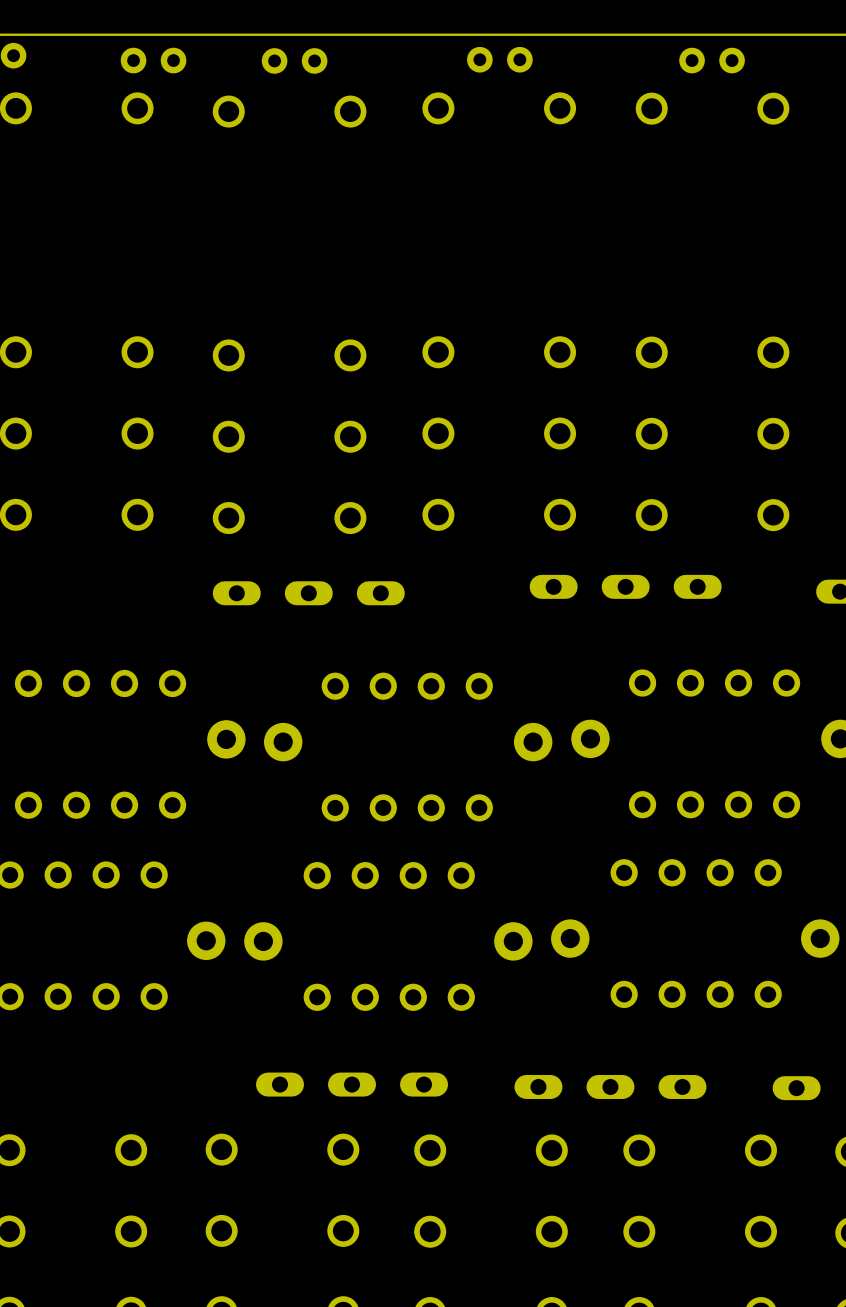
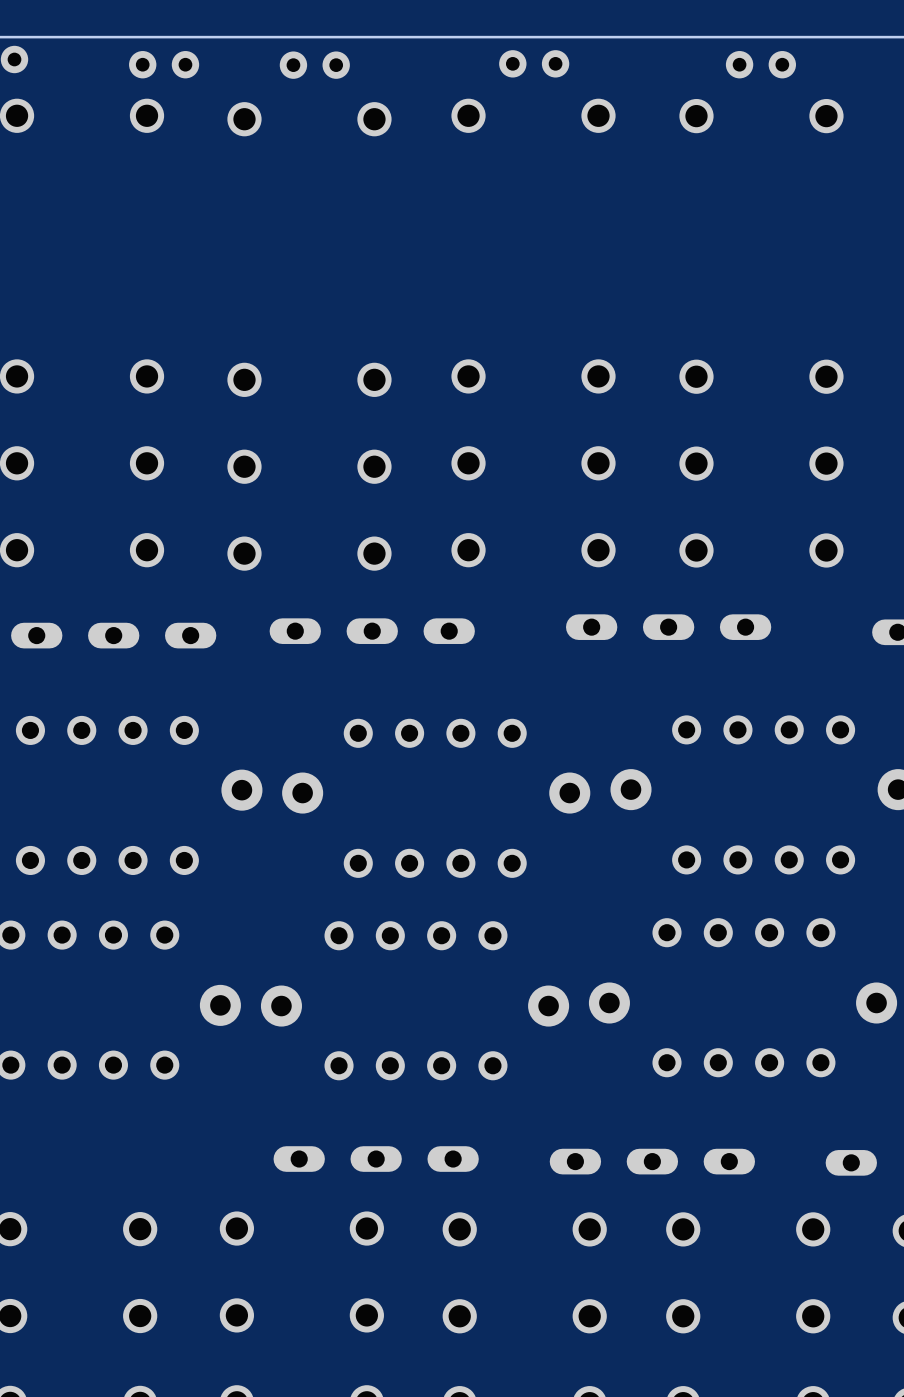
part position: (308, 593) -> (372, 631)
part: none -> (113, 635)

